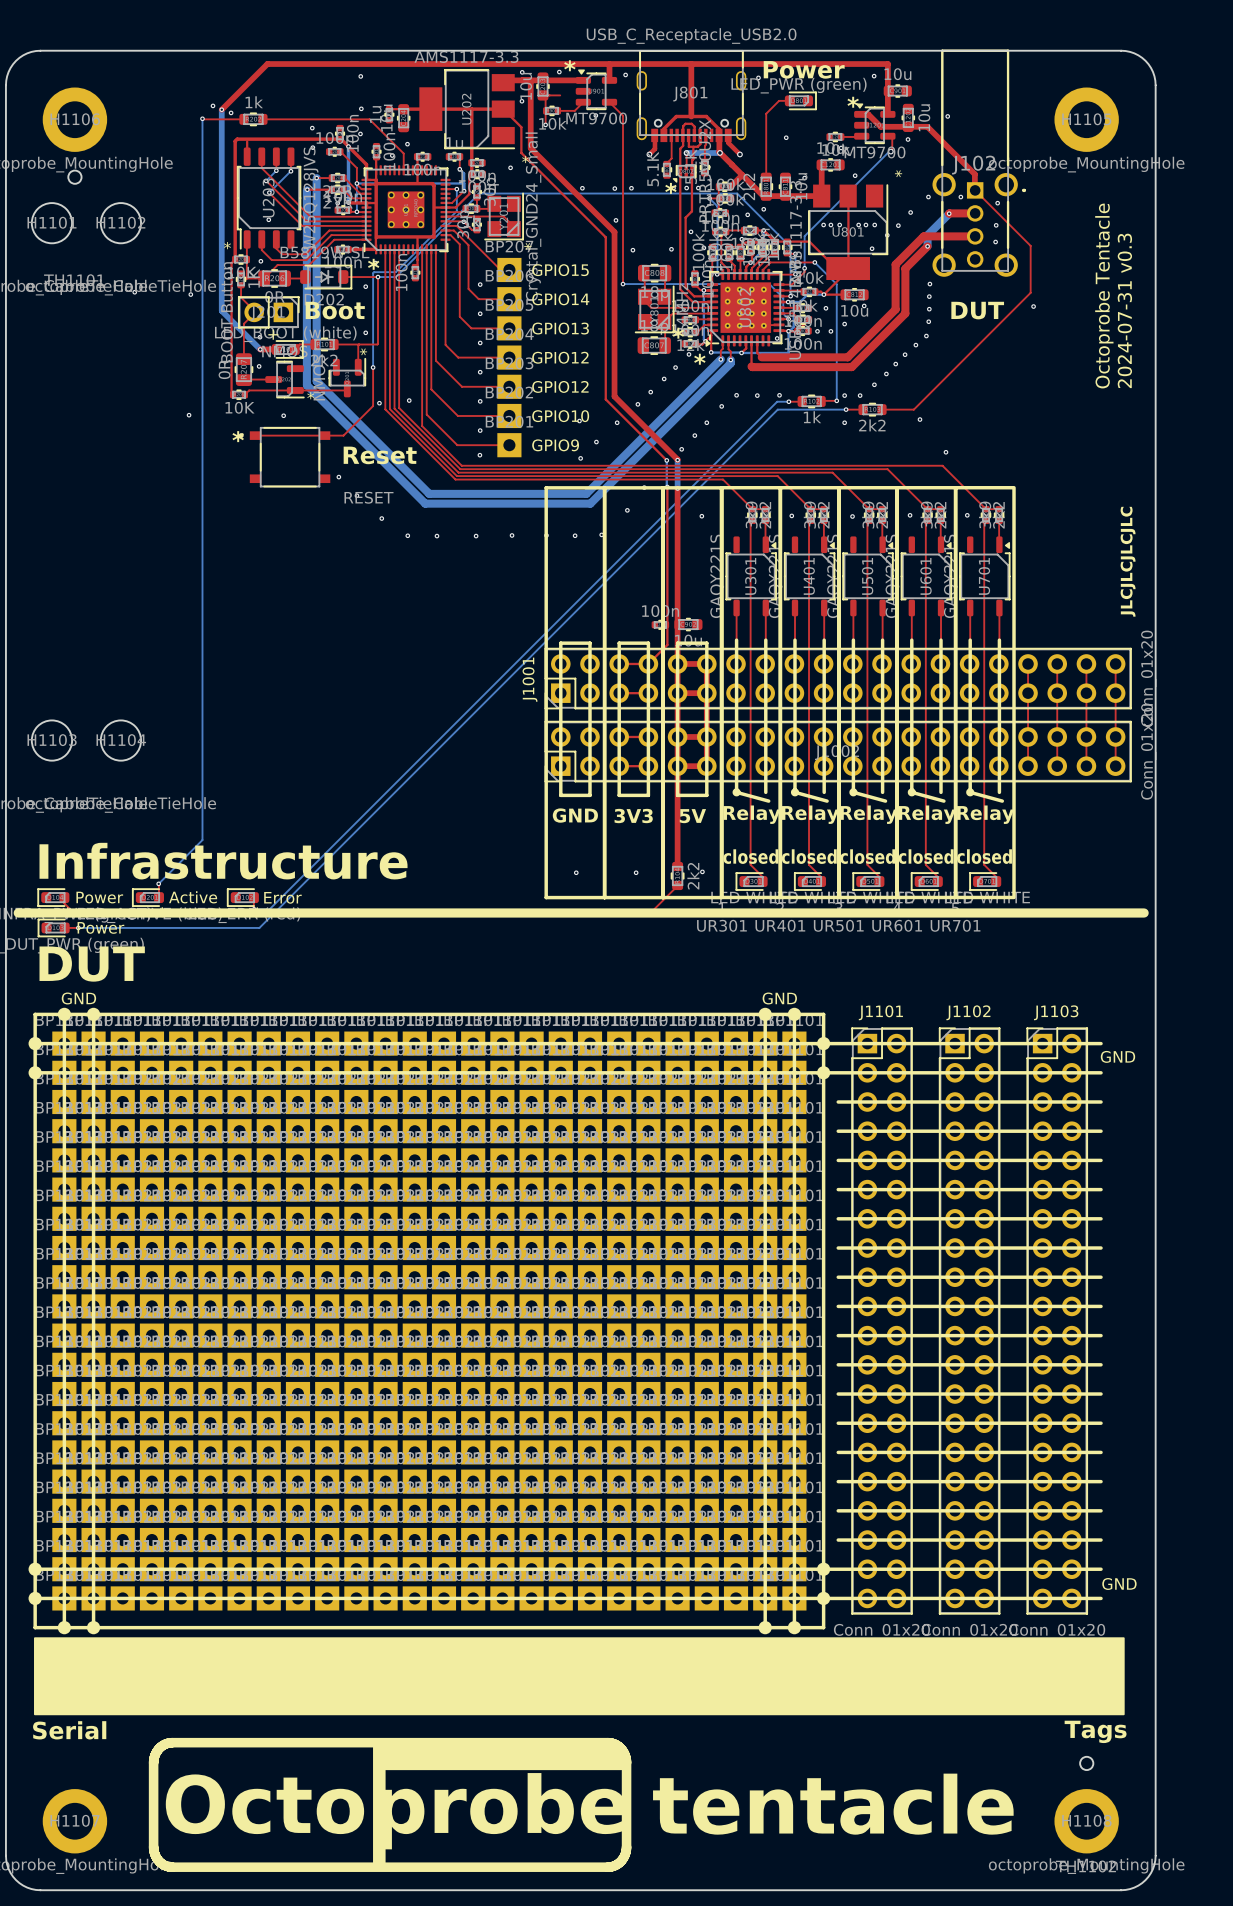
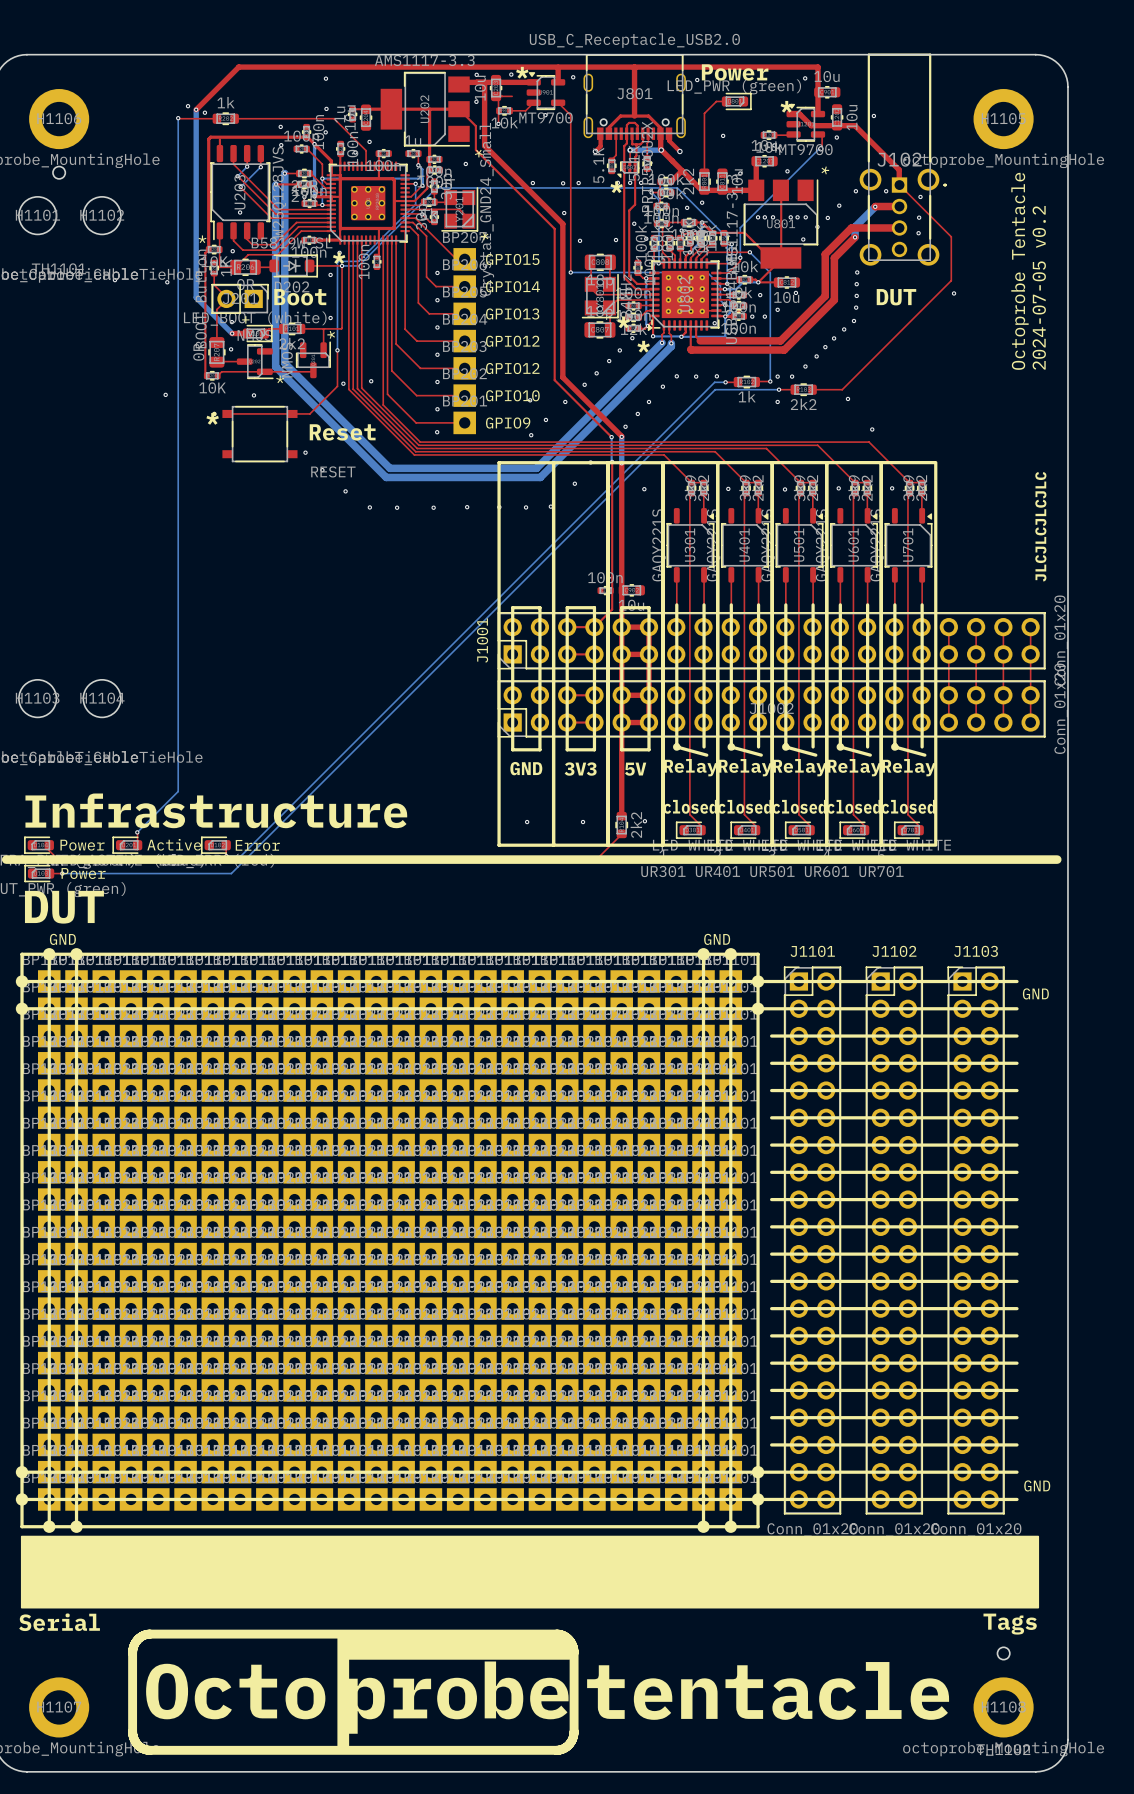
text: 2024-07-31 v0.3 (1124, 310) -> 2024-07-05 v0.2 (1039, 287)

